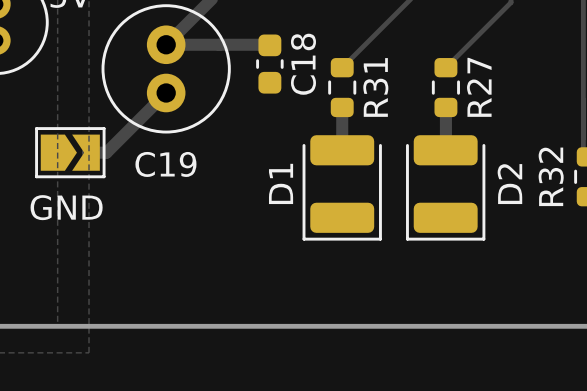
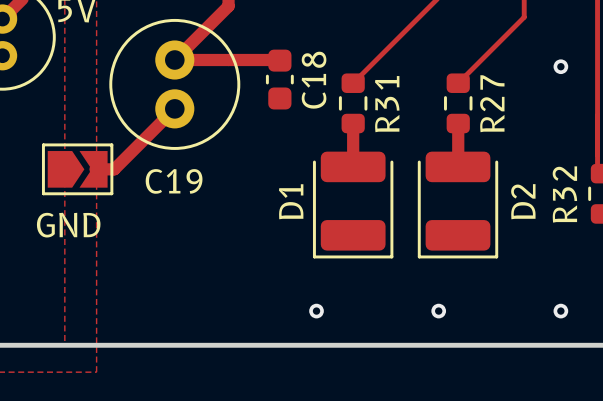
via: none -> (560, 66)
via: none -> (316, 311)
via: none -> (438, 311)
via: none -> (560, 311)

